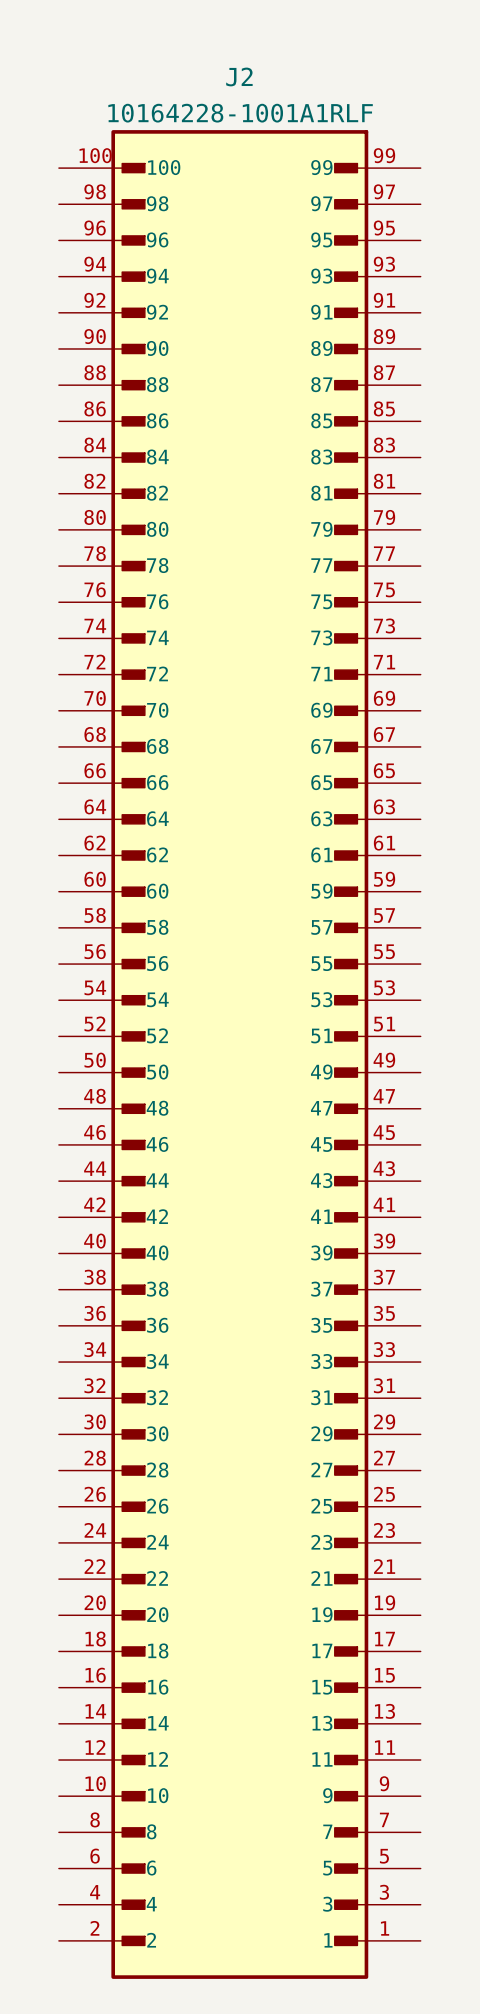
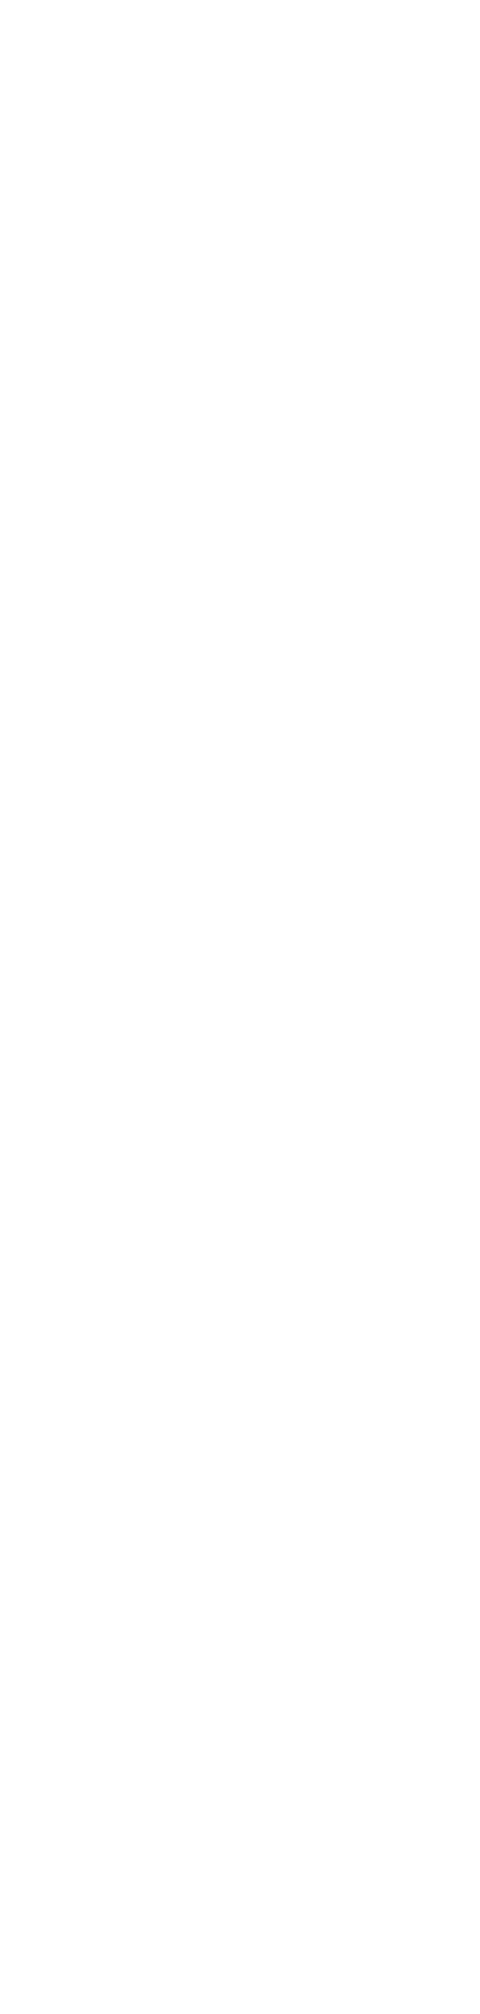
J2: 10164228-1001A1RLF (239, 1054) -> none

